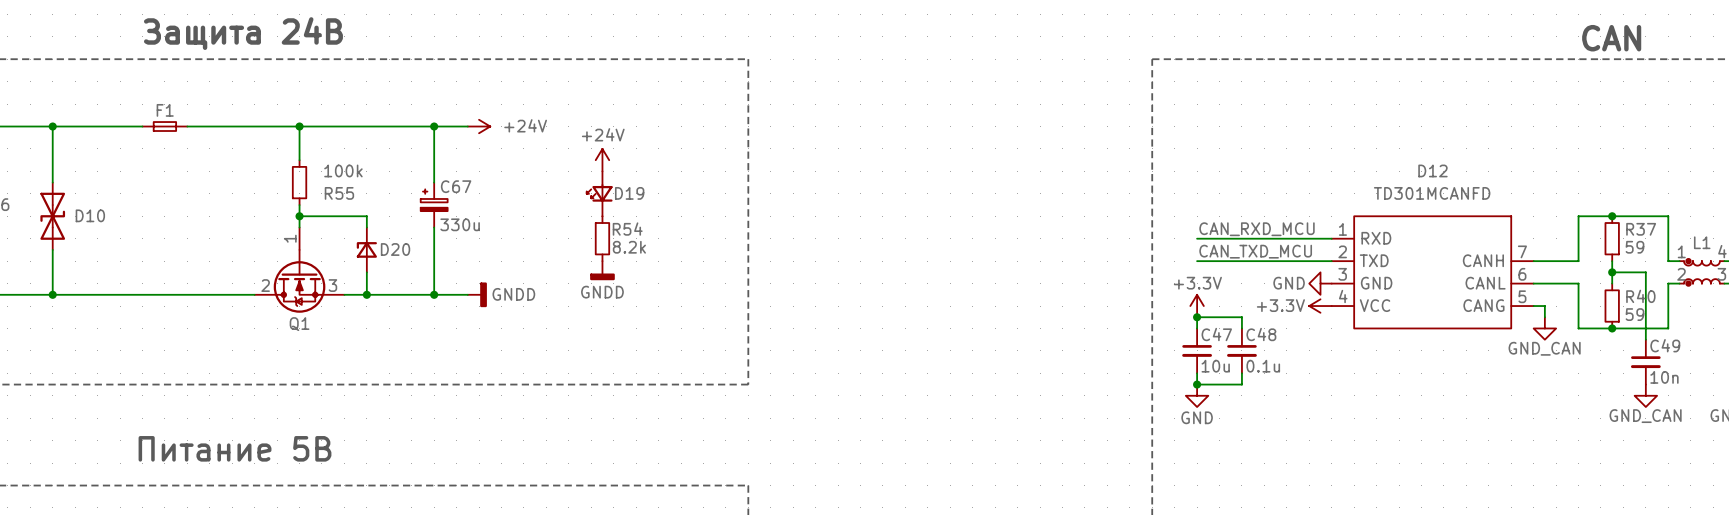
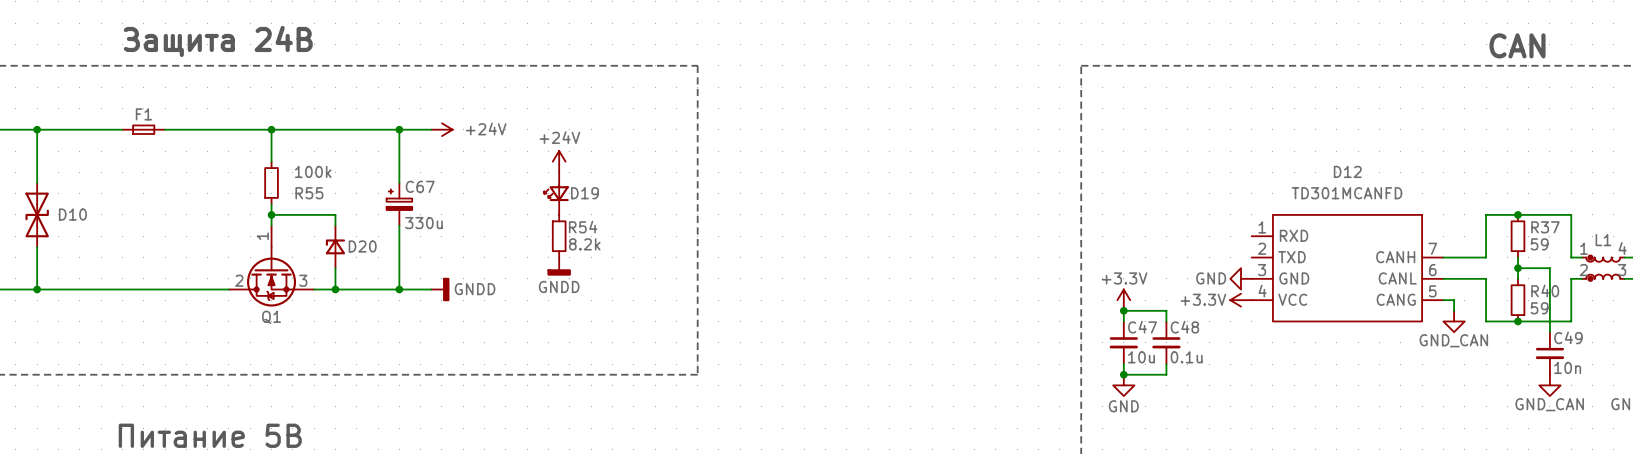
label: CAN_RXD_MCU (1257, 229) -> none
wire: (1197, 238) (1331, 238) -> none
label: CAN_TXD_MCU (1255, 251) -> none
wire: (1197, 261) (1331, 261) -> none

